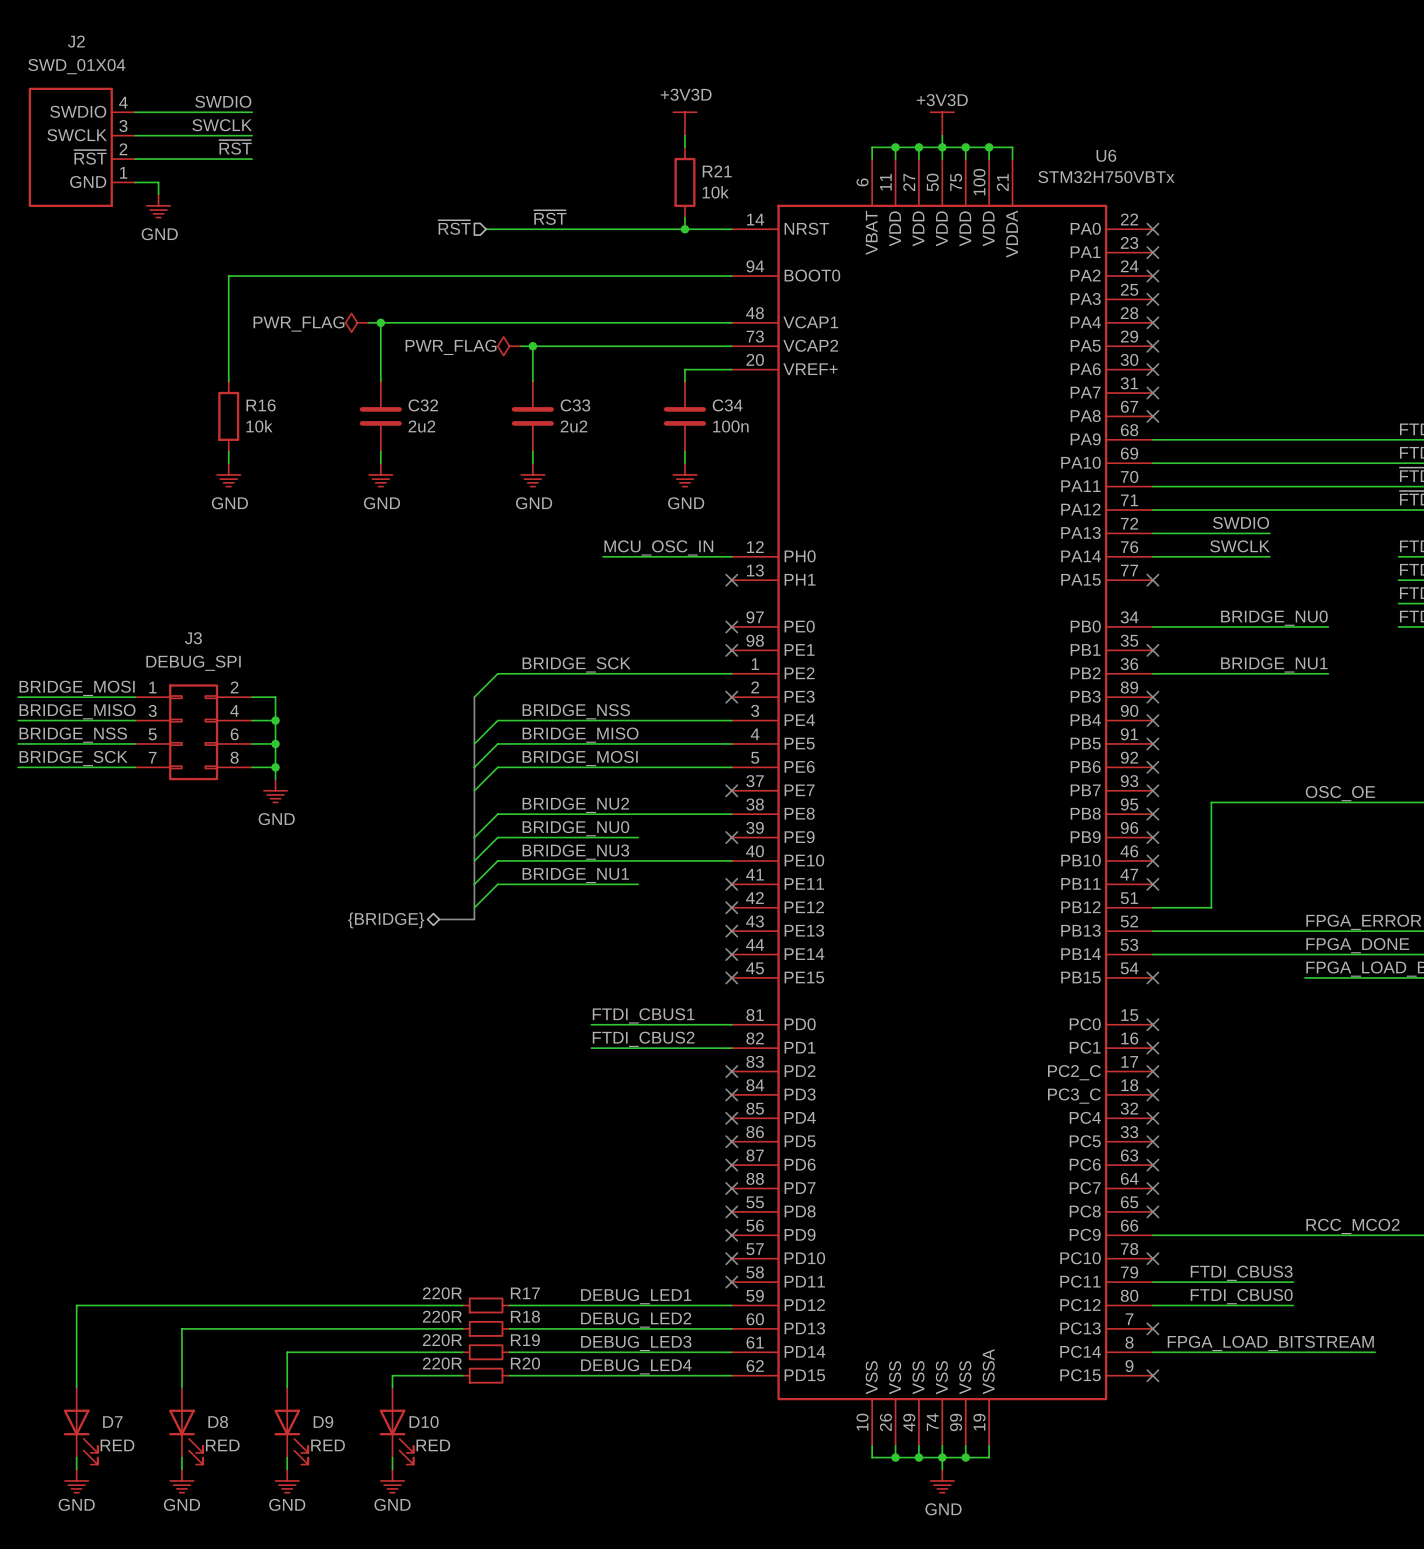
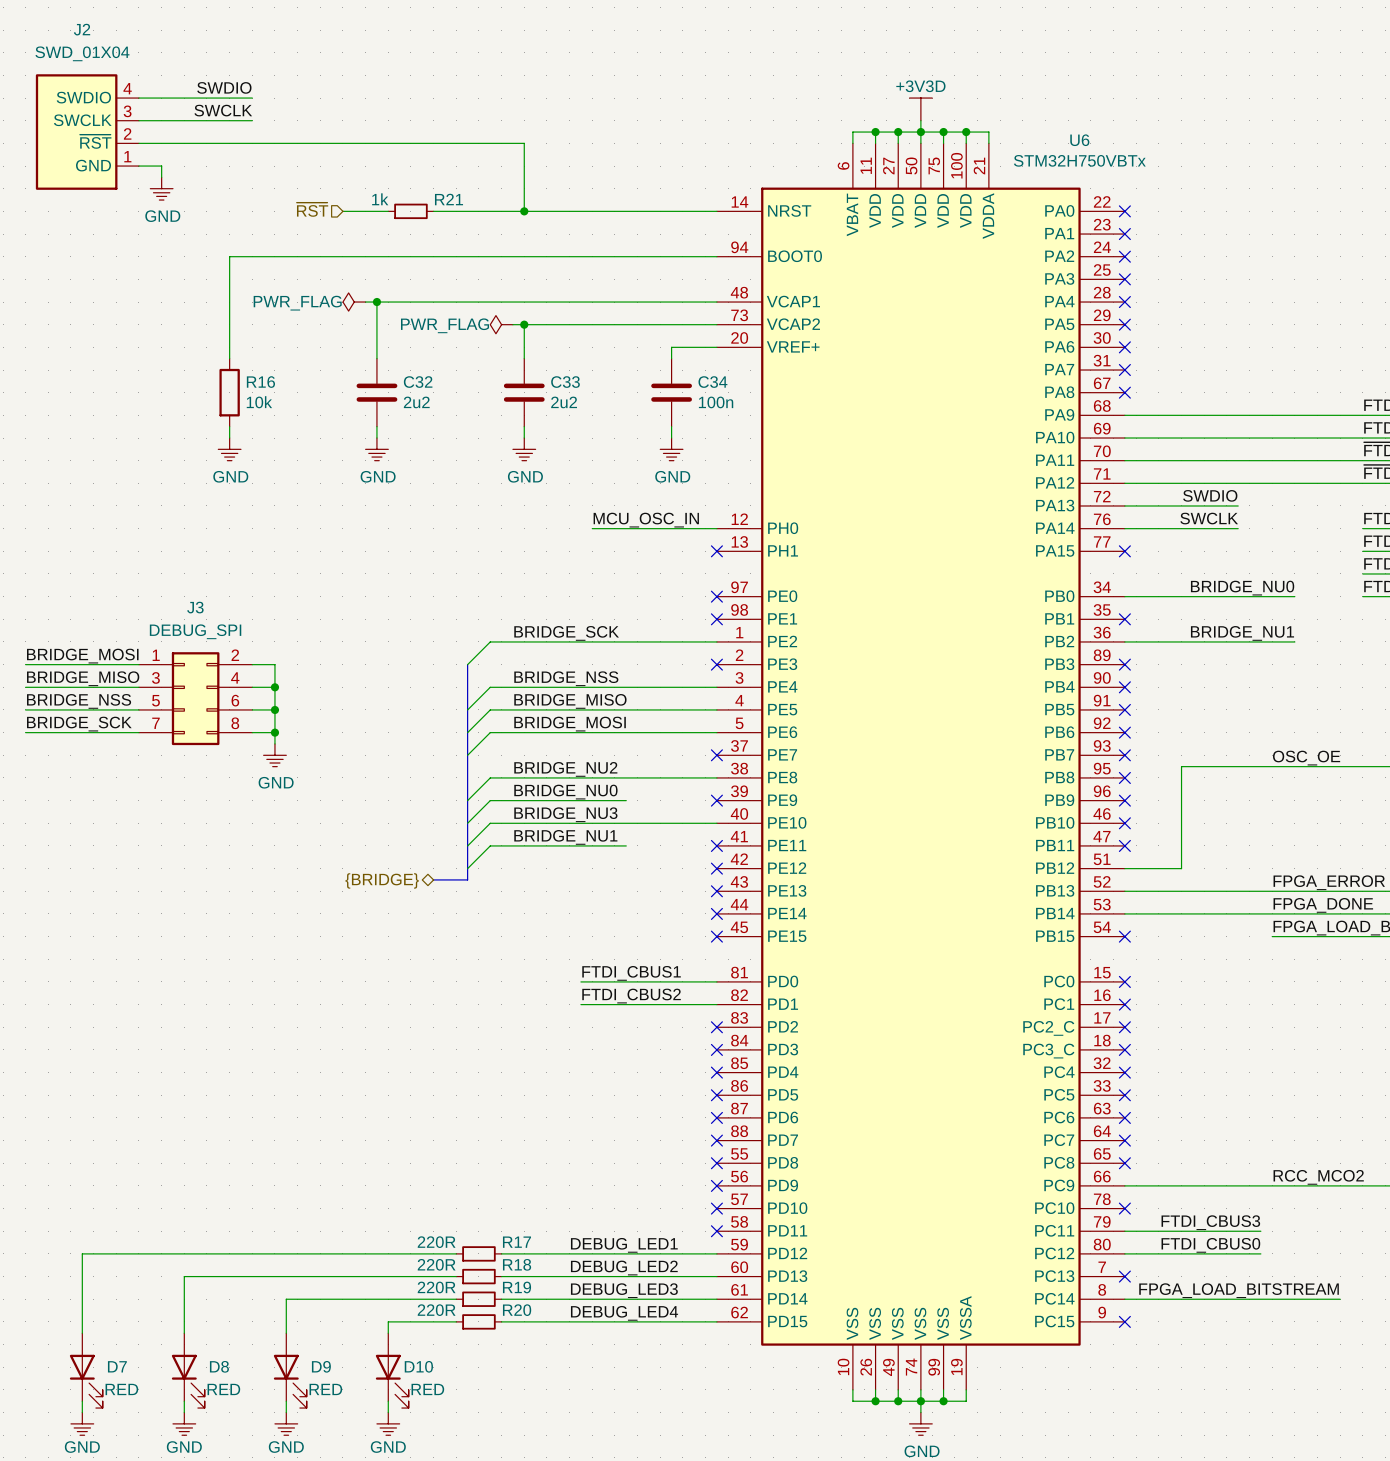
power symbol: +3V3D (684, 123) -> none
wire: (684, 135) (684, 147) -> none
label: ~{RST} (235, 147) -> none
R21 symbol: [674, 147, 696, 218] -> [388, 203, 434, 220]
wire: none -> (252, 143) (524, 143) (524, 211)
R21 value: 10k (715, 192) -> 1k (380, 199)
label: ~{RST} (550, 217) -> none
wire: (684, 217) (684, 229) -> none
hierarchical label position: ~{RST} (454, 227) -> ~{RST} (312, 209)
wire: none -> (342, 211) (388, 211)
wire: none -> (433, 211) (478, 211)
junction: none -> (524, 211)
junction: (684, 229) -> none

